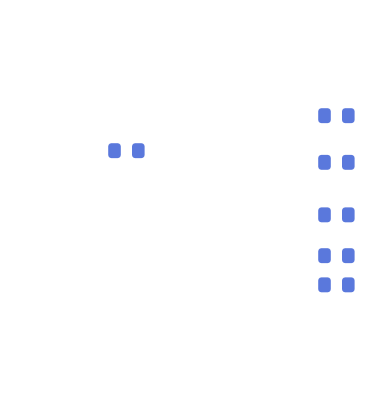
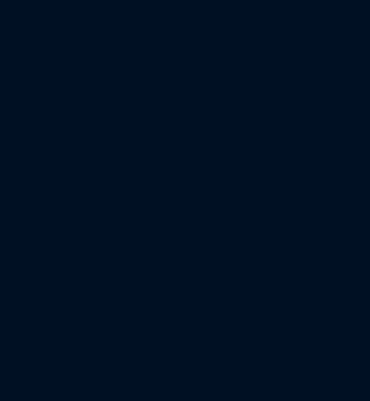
part: (336, 115) -> none
part: (126, 150) -> none
part: (336, 162) -> none
part: (336, 214) -> none
part: (336, 255) -> none
part: (336, 284) -> none

